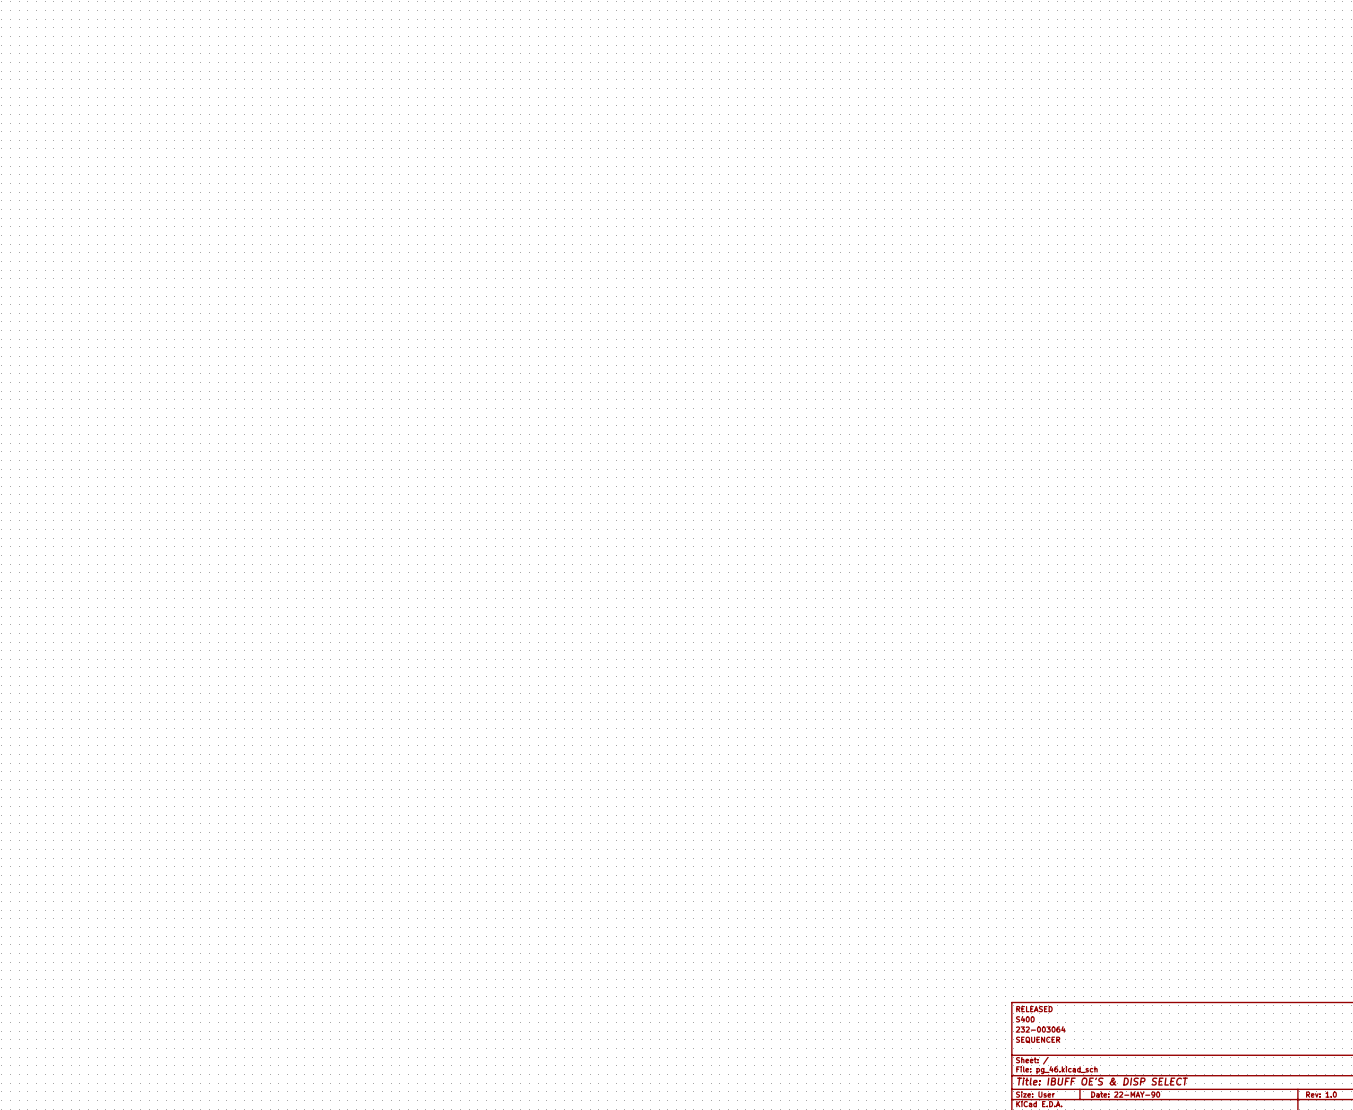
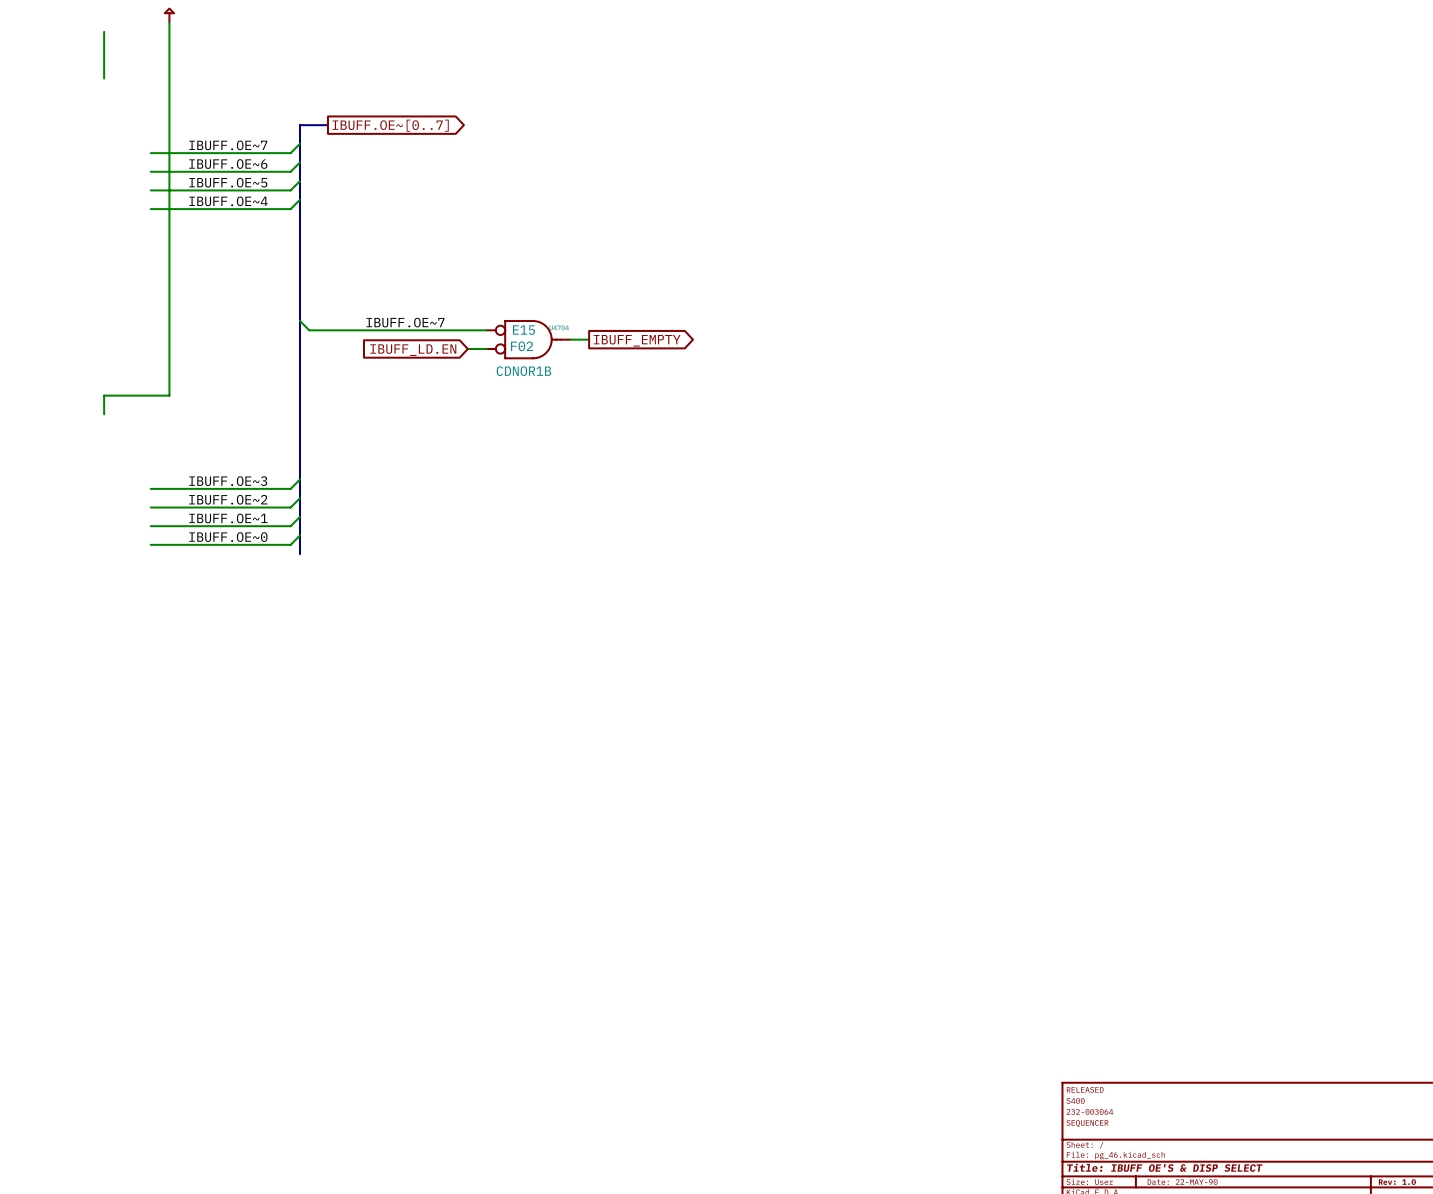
power symbol: none -> (169, 15)
wire: none -> (169, 22) (169, 395) (104, 395) (104, 414)
wire: none -> (104, 31) (104, 78)
bus: none -> (327, 125) (299, 125) (299, 554)
global label: none -> IBUFF.OE~[0..7] (390, 125)
wire: none -> (299, 143) (290, 153) (150, 153)
label: none -> IBUFF.OE~7 (228, 145)
wire: none -> (299, 162) (290, 171) (150, 171)
label: none -> IBUFF.OE~6 (228, 164)
wire: none -> (299, 181) (290, 190) (150, 190)
label: none -> IBUFF.OE~5 (228, 182)
wire: none -> (299, 199) (290, 209) (150, 209)
label: none -> IBUFF.OE~4 (228, 201)
wire: none -> (299, 321) (309, 330) (486, 330)
label: none -> IBUFF.OE~7 (405, 322)
part: none -> F02 (528, 339)
wire: none -> (570, 339) (589, 339)
global label: none -> IBUFF_EMPTY (637, 340)
wire: none -> (467, 348) (486, 348)
global label: none -> IBUFF_LD.EN (413, 350)
wire: none -> (299, 479) (290, 488) (150, 488)
label: none -> IBUFF.OE~3 (228, 481)
wire: none -> (299, 498) (290, 507) (150, 507)
label: none -> IBUFF.OE~2 (228, 499)
wire: none -> (299, 516) (290, 526) (150, 526)
label: none -> IBUFF.OE~1 (228, 518)
wire: none -> (299, 535) (290, 544) (150, 544)
label: none -> IBUFF.OE~0 (228, 537)

